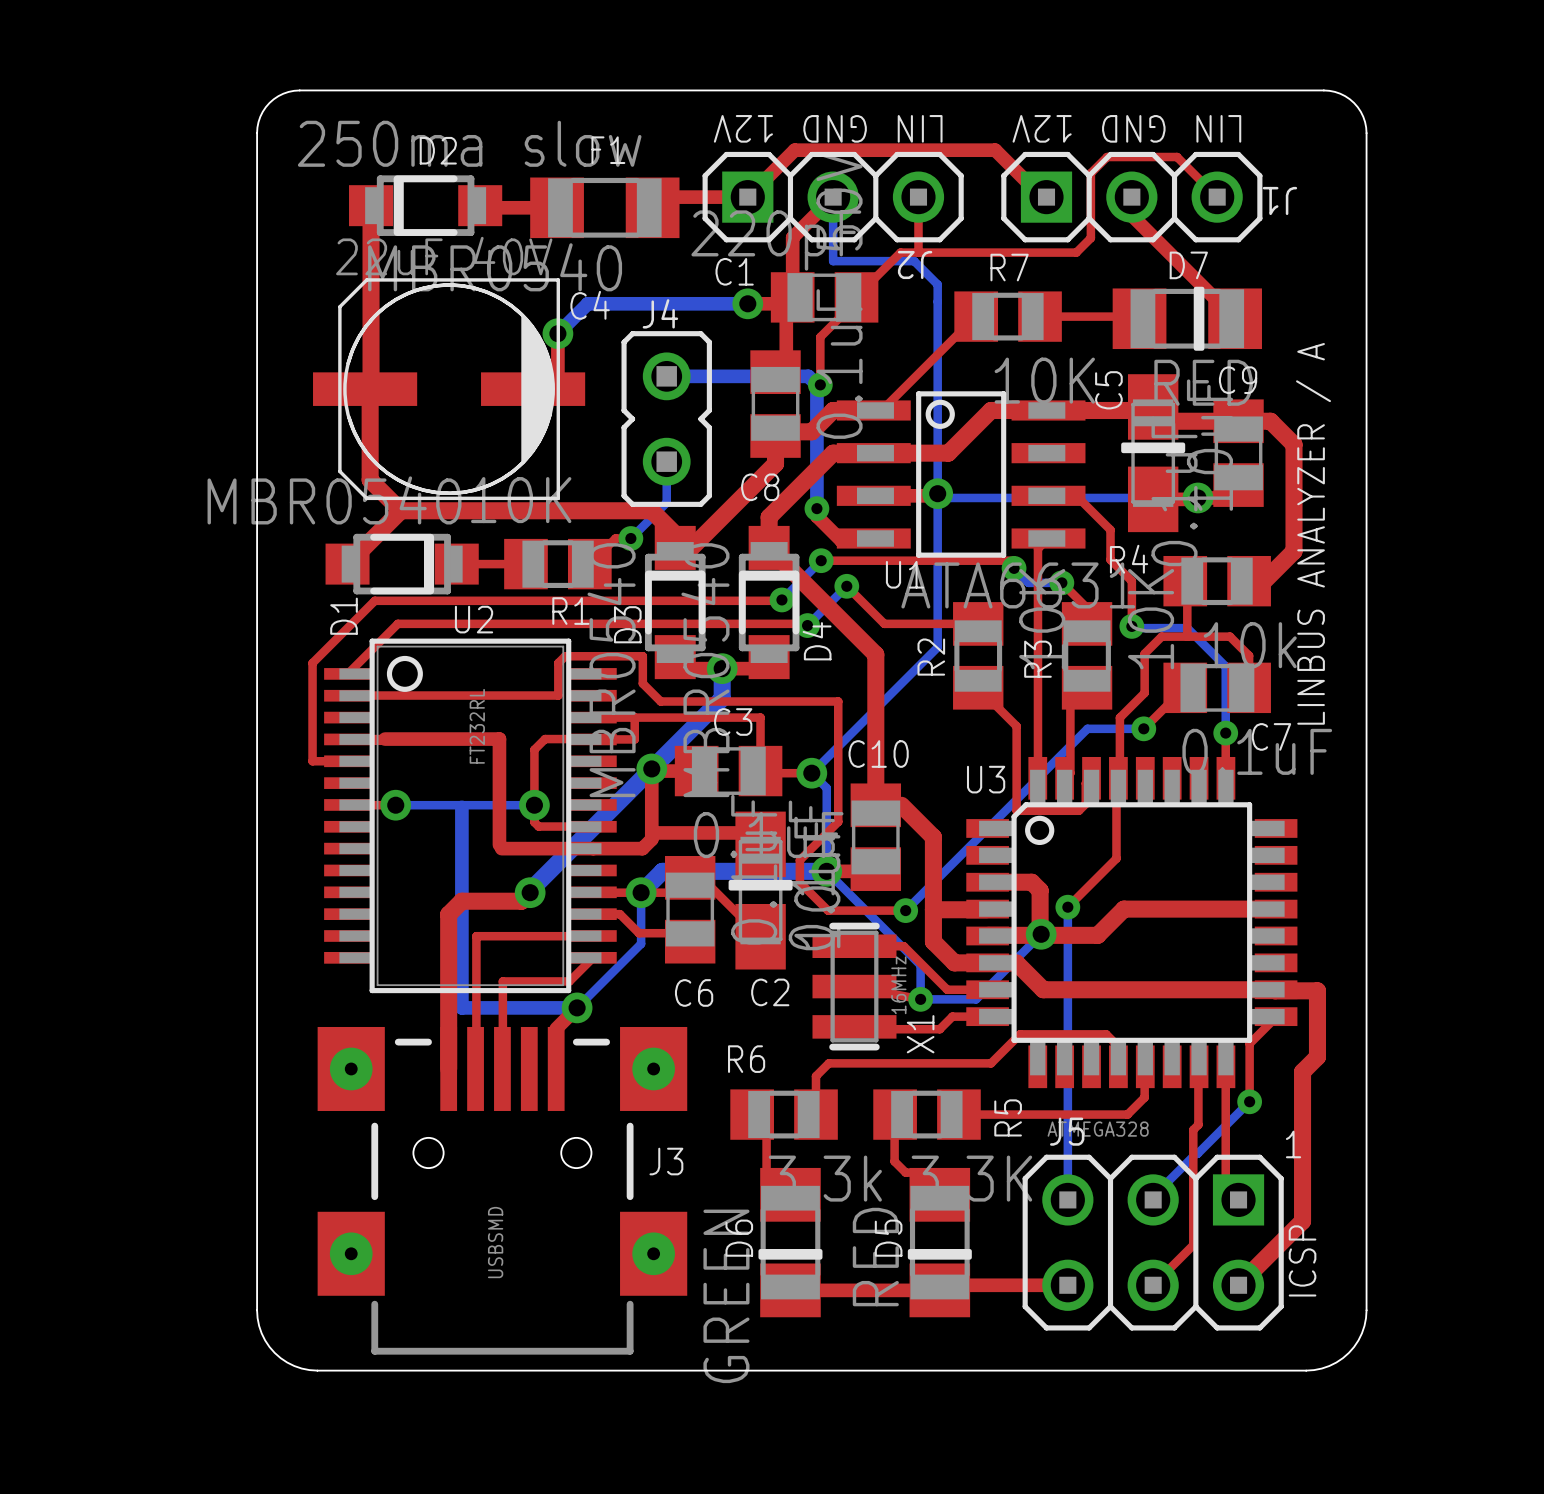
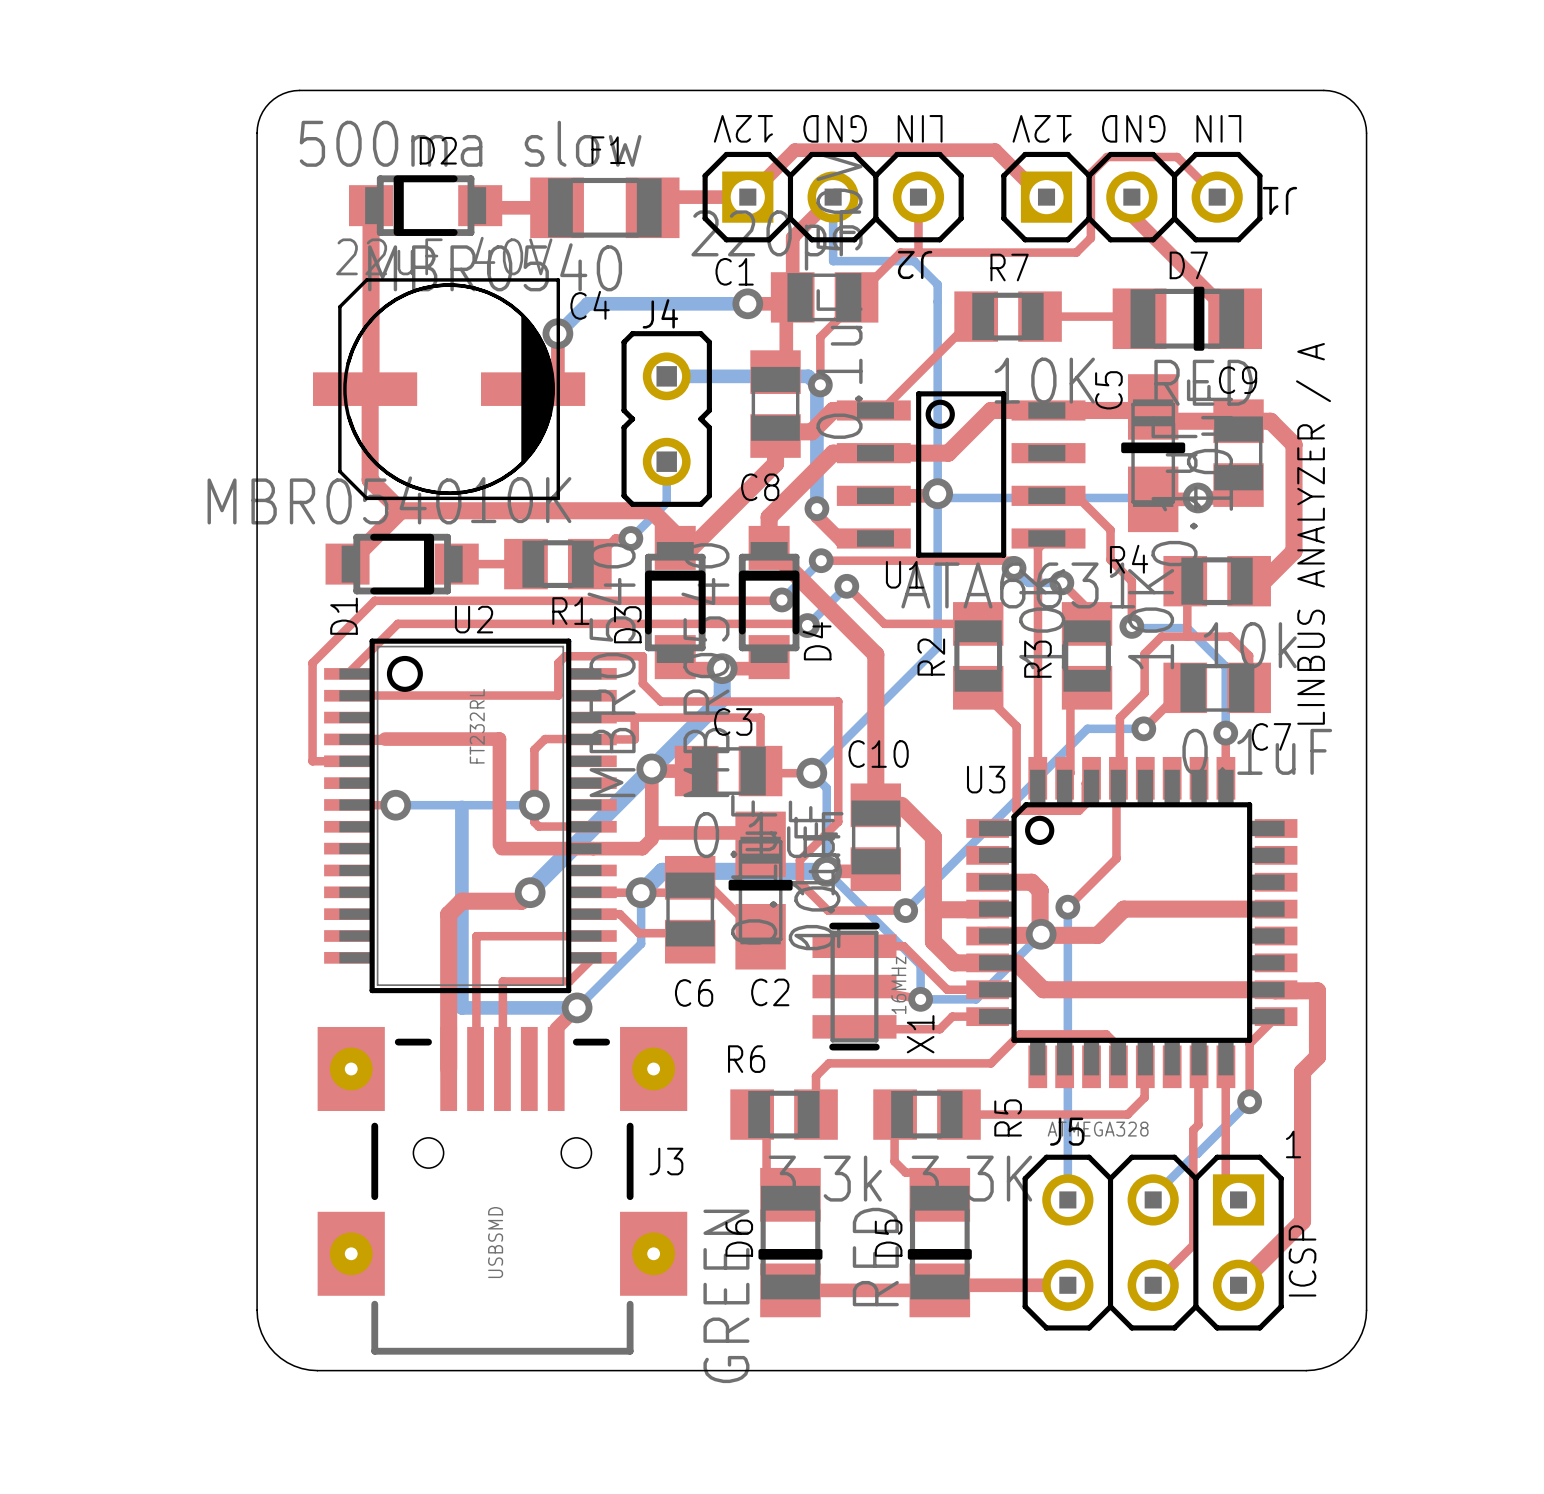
F1 value: 250ma slow (469, 143) -> 500ma slow (470, 143)

